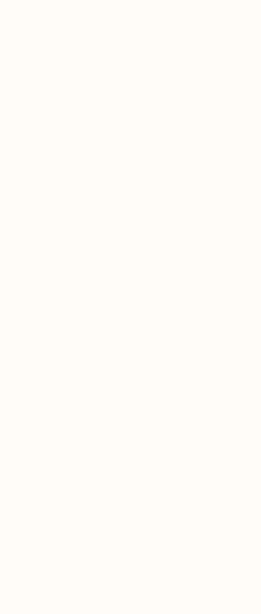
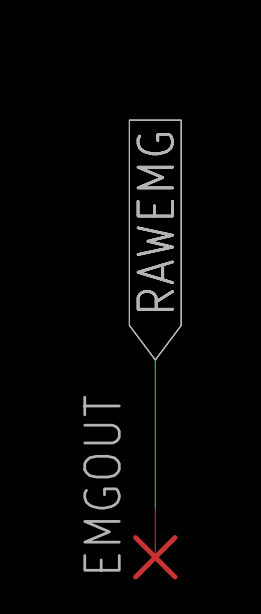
global label: none -> RAWEMG (155, 221)
wire: none -> (155, 359) (155, 507)
EMGOUT: none -> (155, 543)

